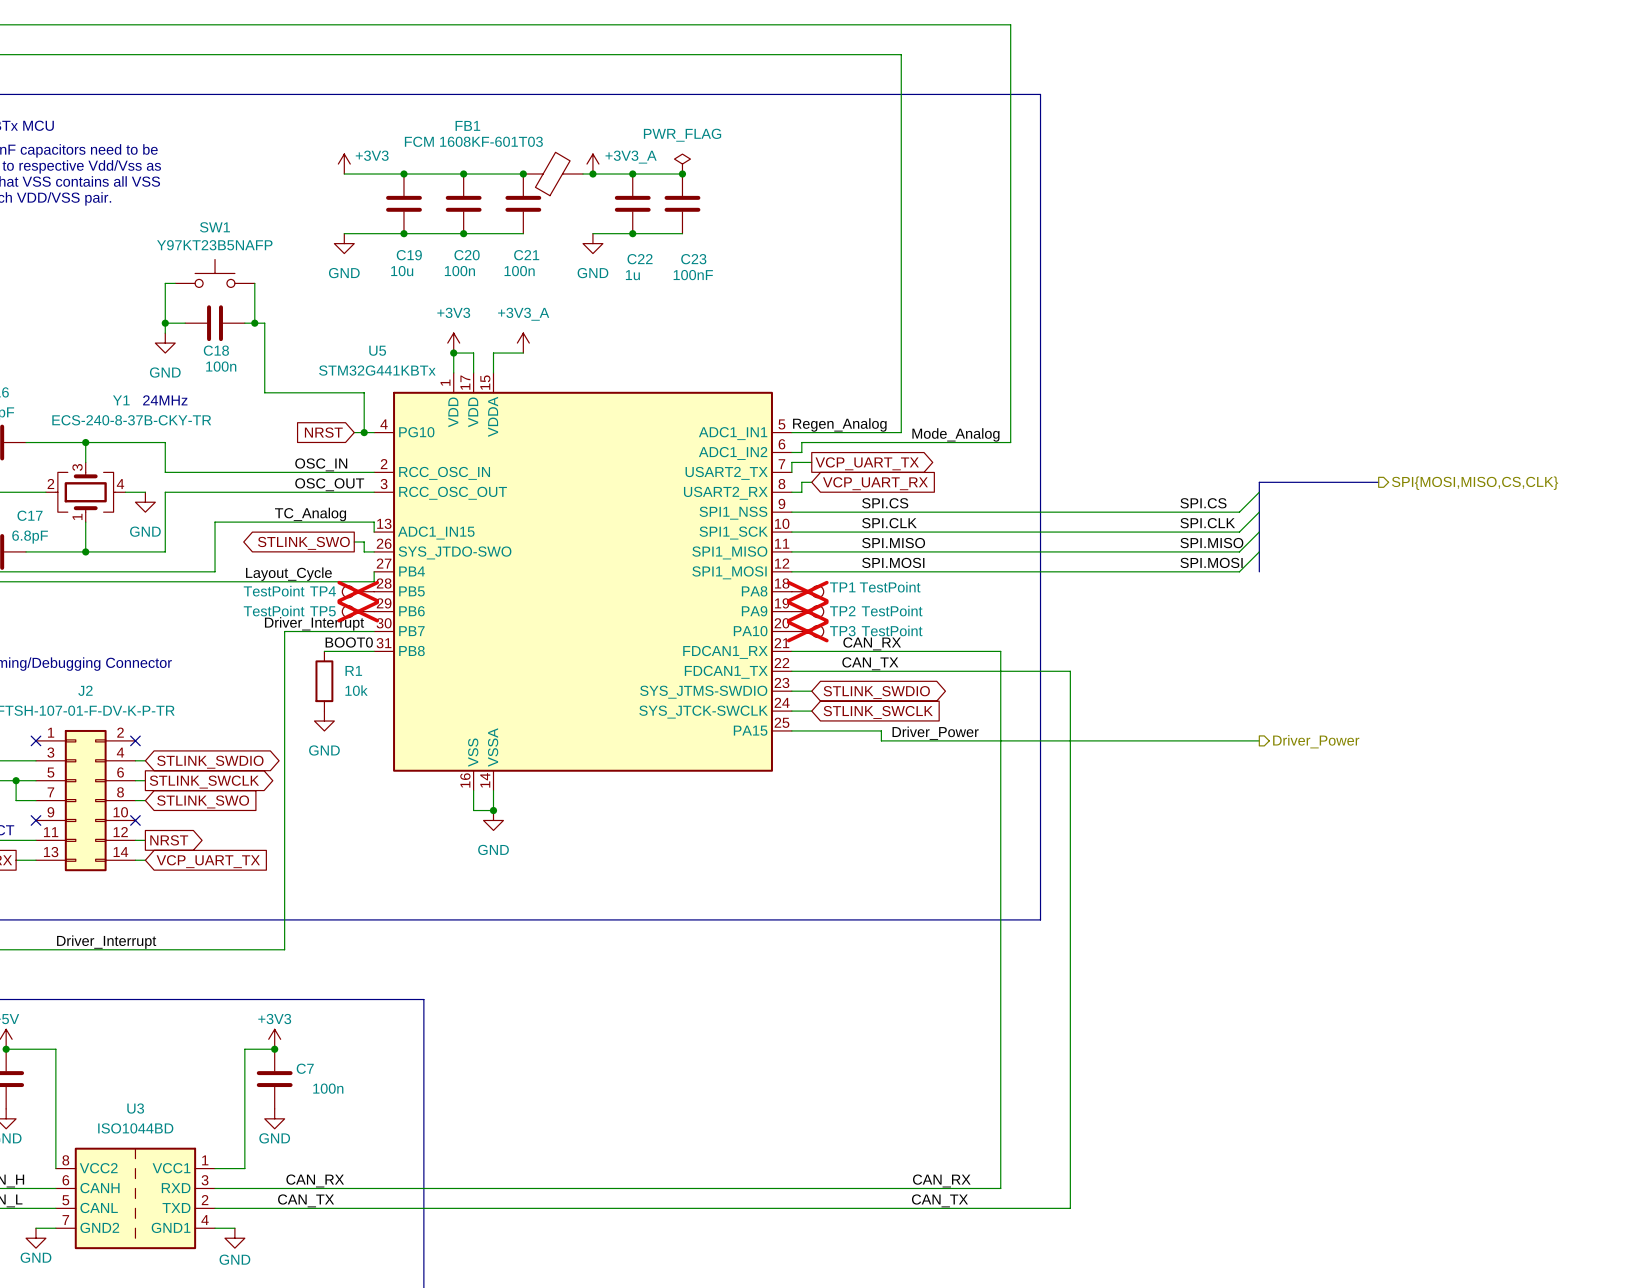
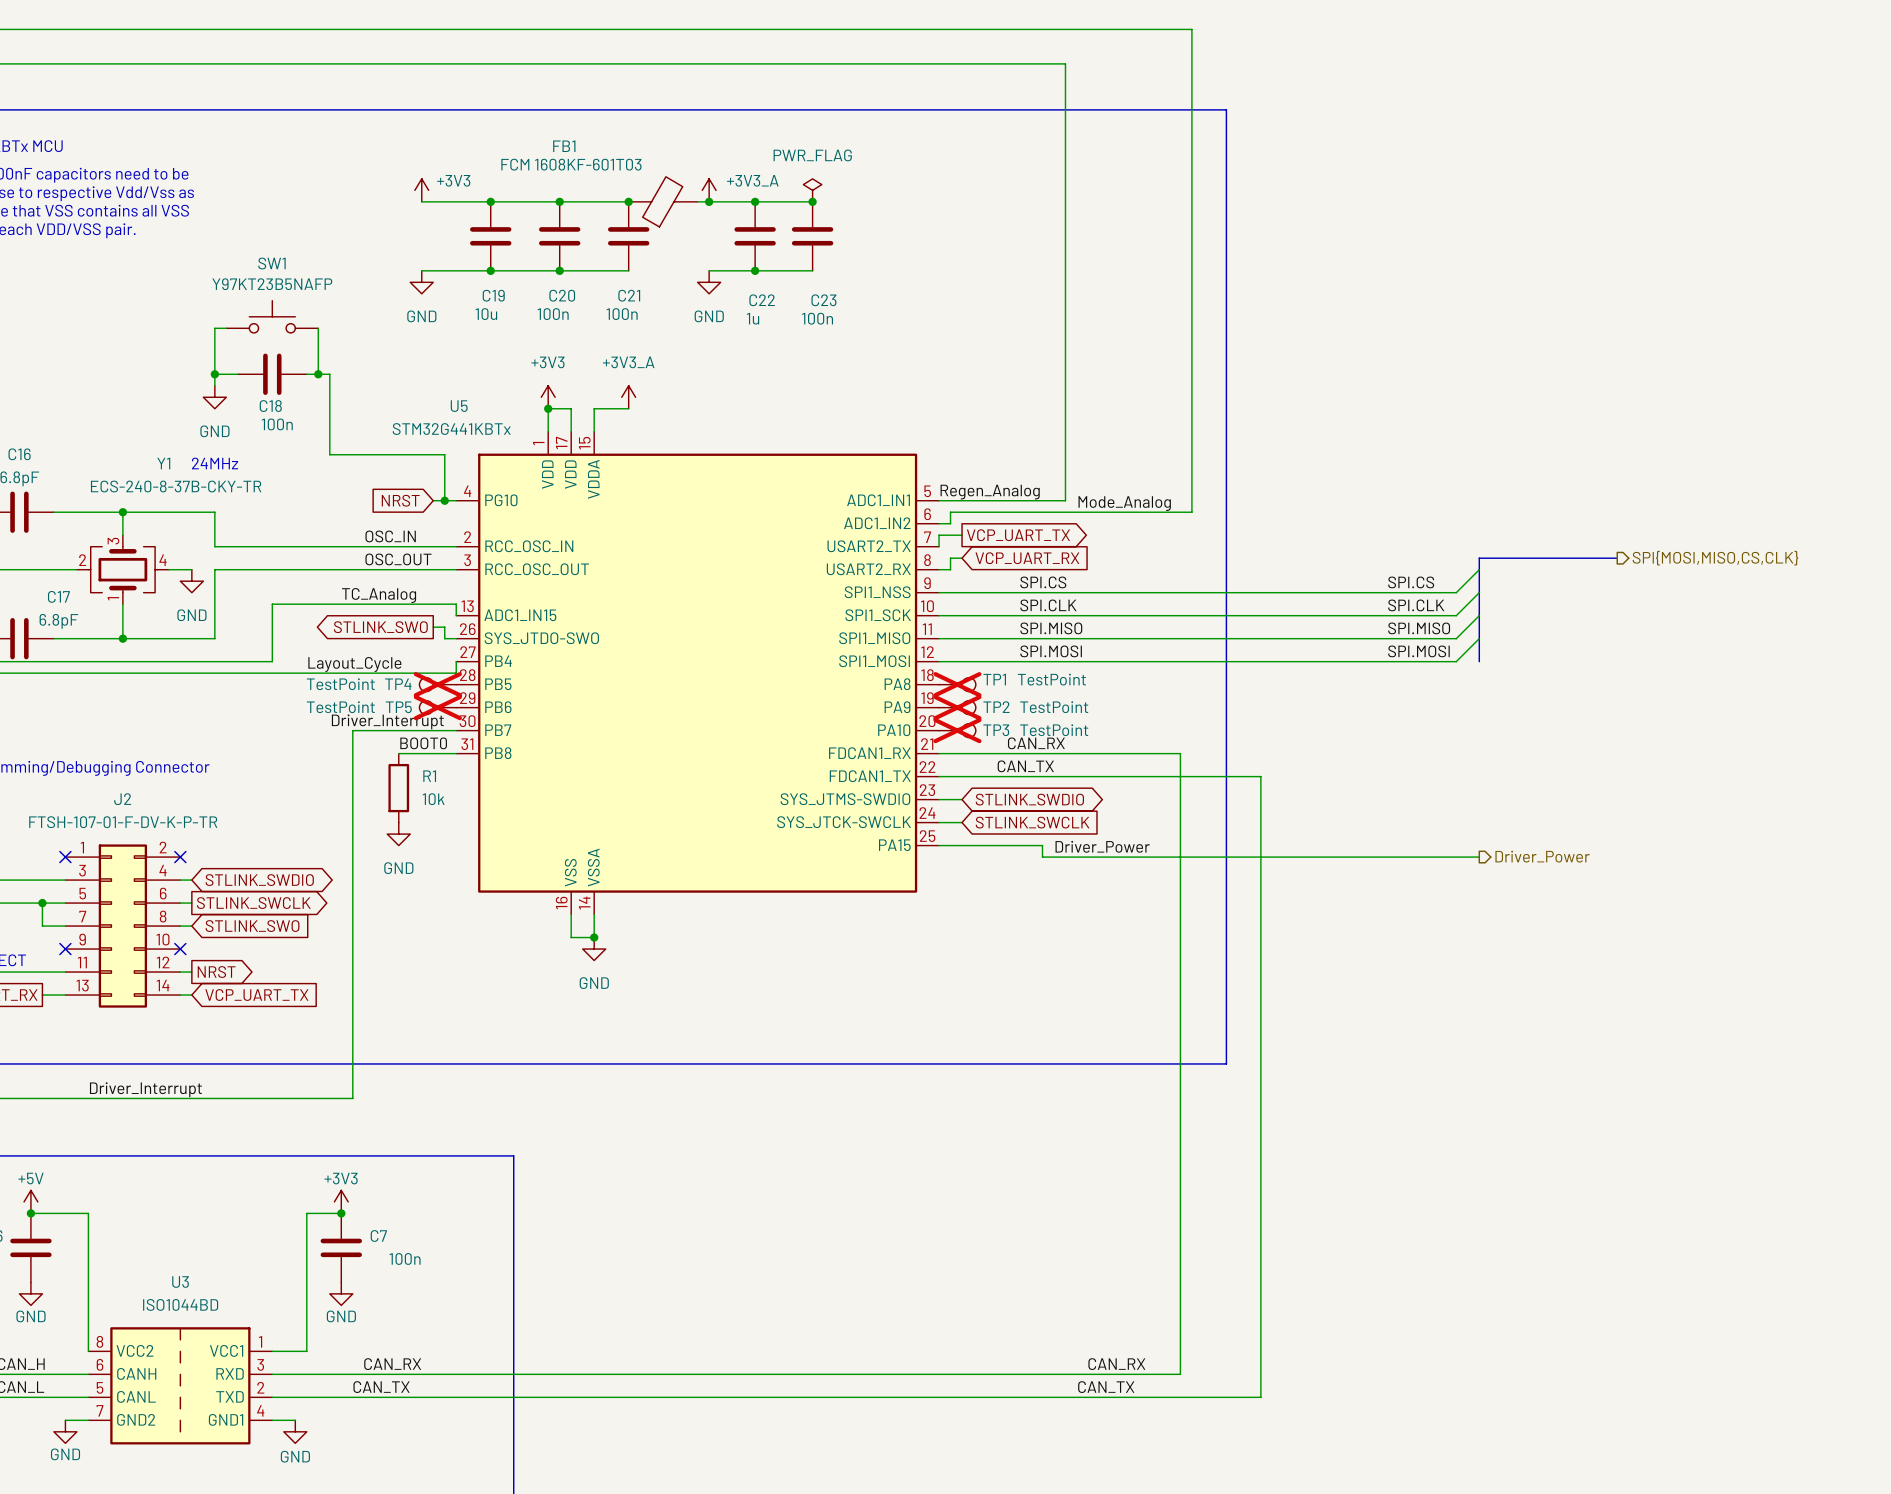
C23 value: 100nF (693, 275) -> 100n (817, 318)

